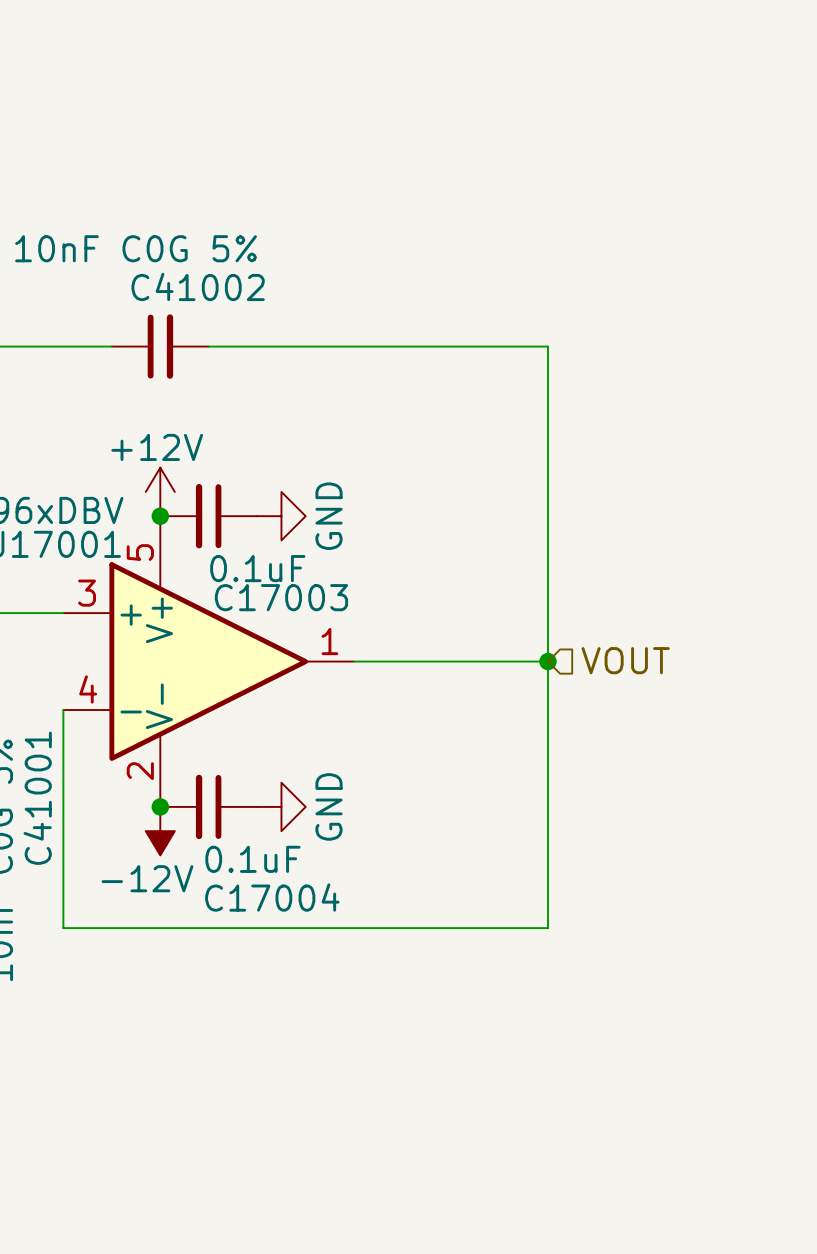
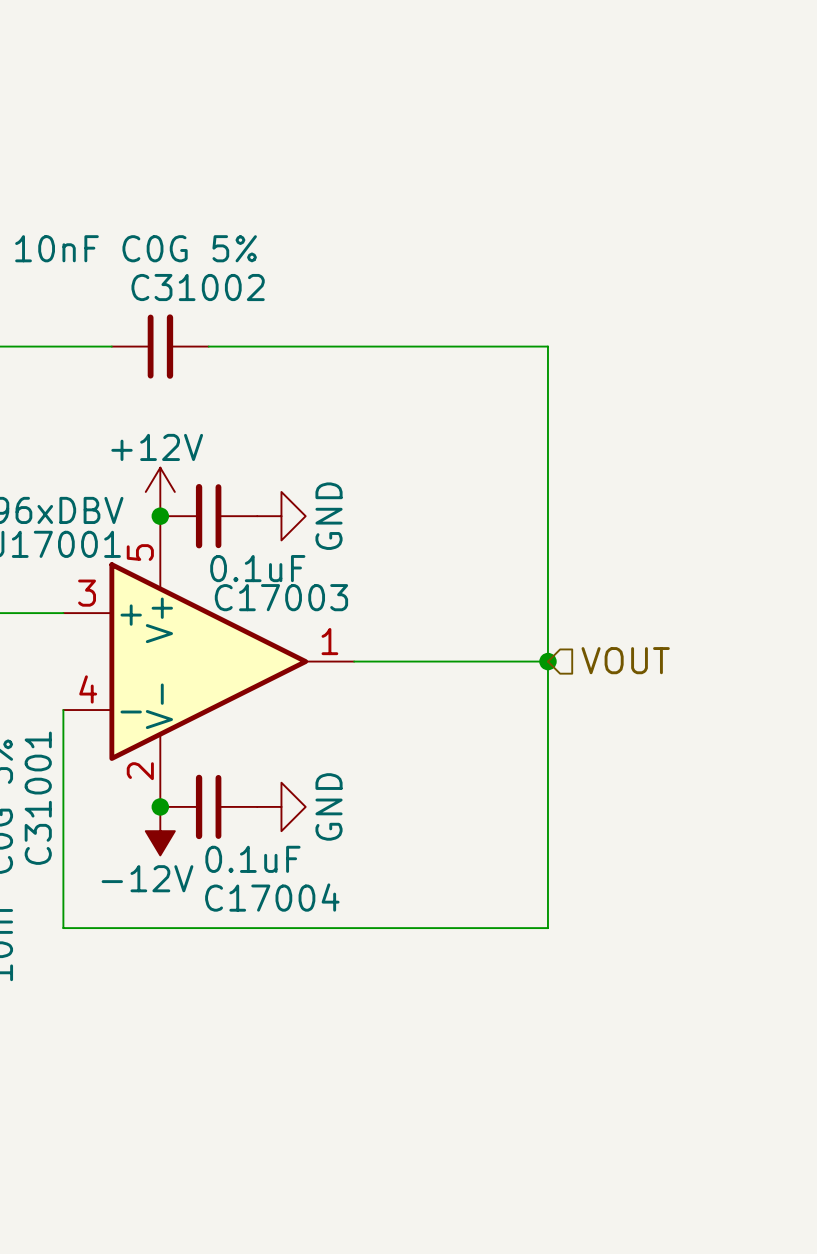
C41002 name: C41002 (198, 286) -> C31002 (198, 287)
C41001 name: C41001 (37, 798) -> C31001 (38, 798)

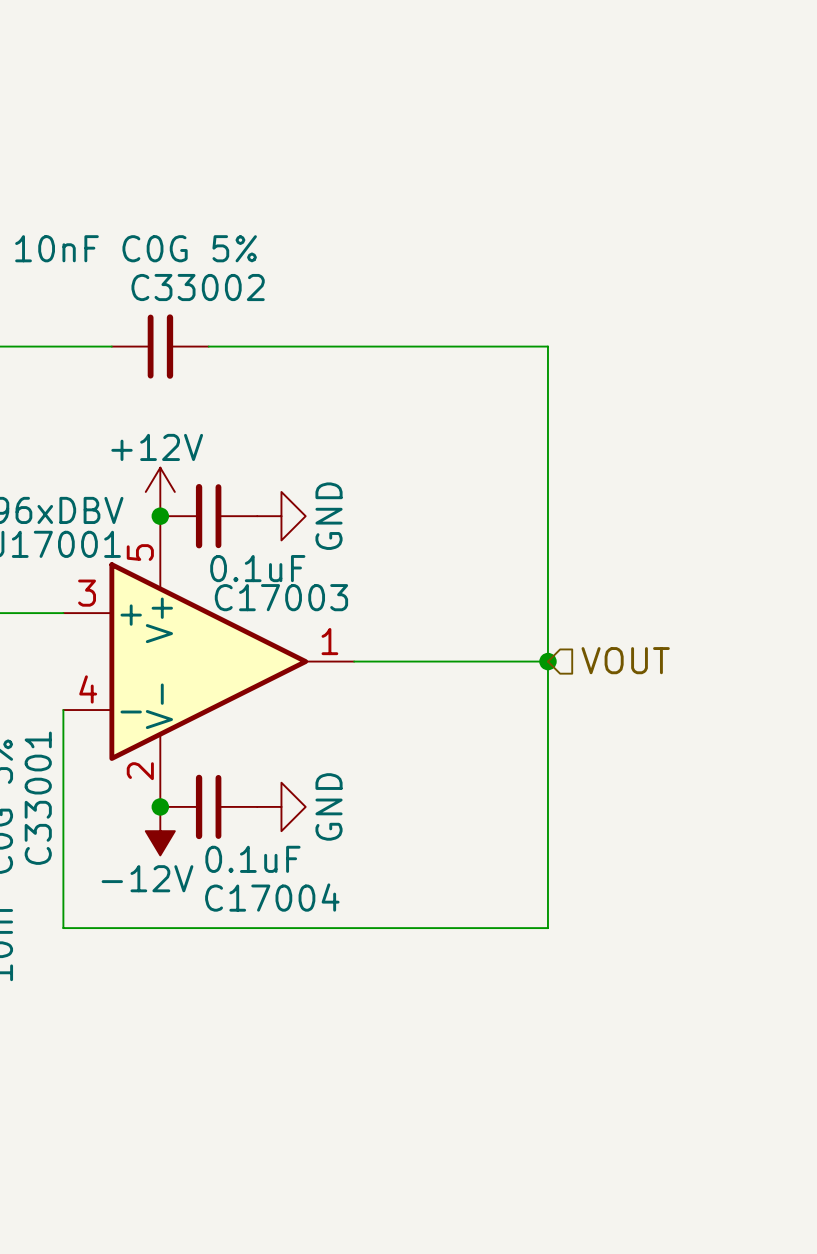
C31002 name: C31002 (198, 287) -> C33002 (198, 287)
C31001 name: C31001 (38, 798) -> C33001 (38, 798)

